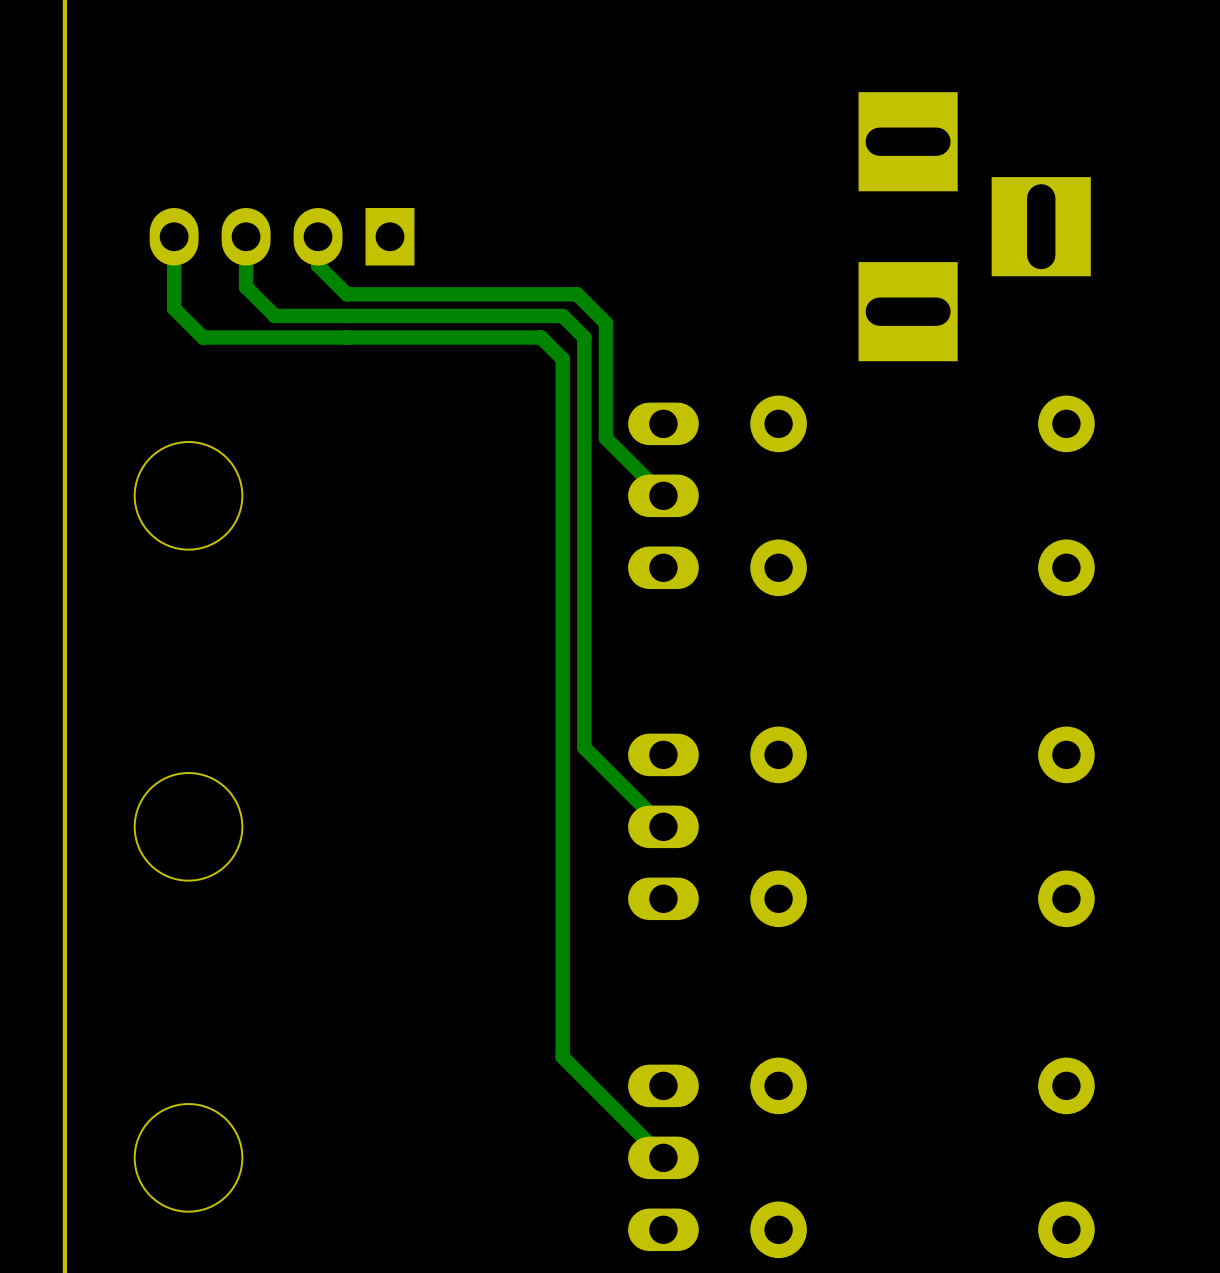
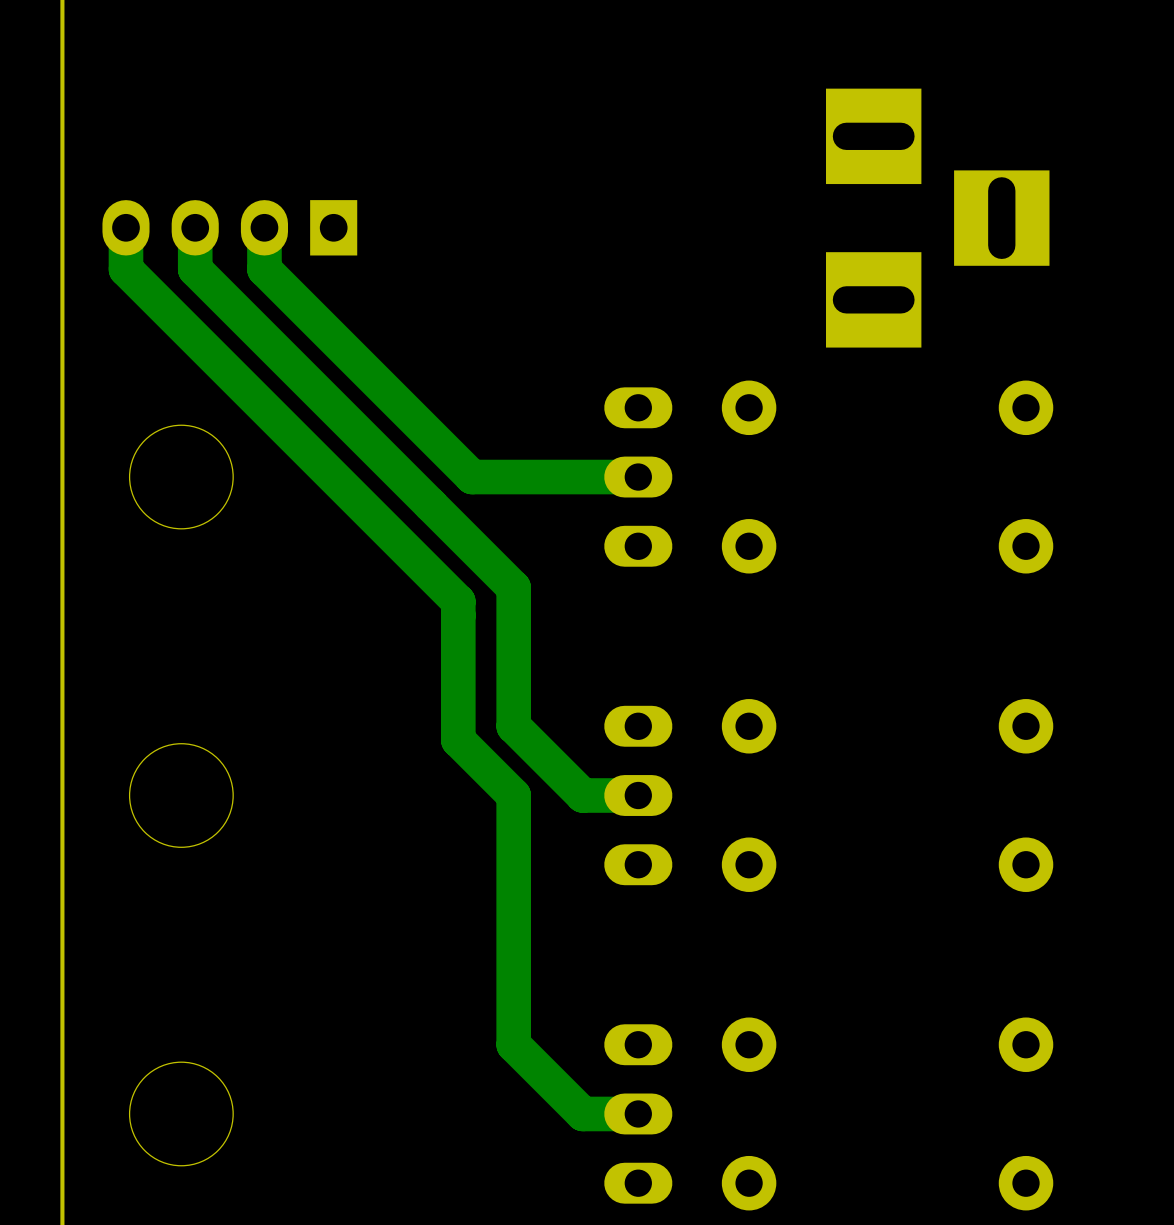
track: (174, 236) (174, 308) (202, 337) (541, 337) (562, 359) (562, 1057) (663, 1157) -> (125, 227) (125, 269) (458, 601) (458, 740) (513, 795) (513, 1044) (582, 1113) (638, 1113)
track: (246, 236) (246, 287) (274, 315) (562, 315) (584, 337) (584, 747) (663, 826) -> (195, 227) (195, 269) (513, 587) (513, 726) (582, 795) (638, 795)
part position: (282, 236) -> (229, 227)
track: (318, 236) (318, 265) (346, 294) (577, 294) (605, 323) (605, 438) (663, 495) -> (264, 227) (264, 269) (472, 477) (638, 477)

